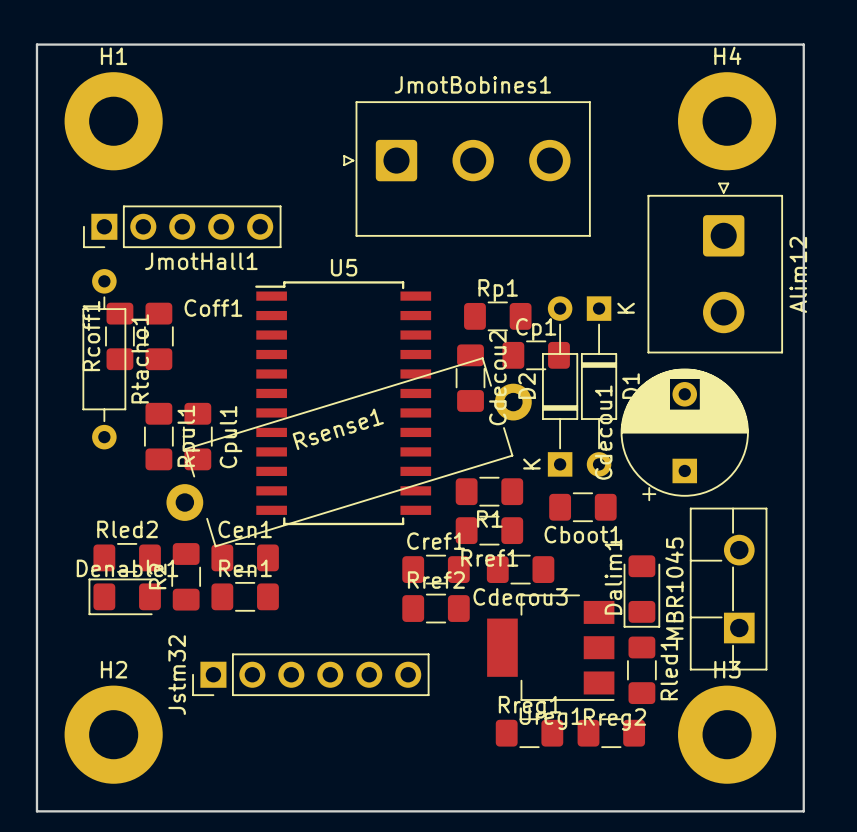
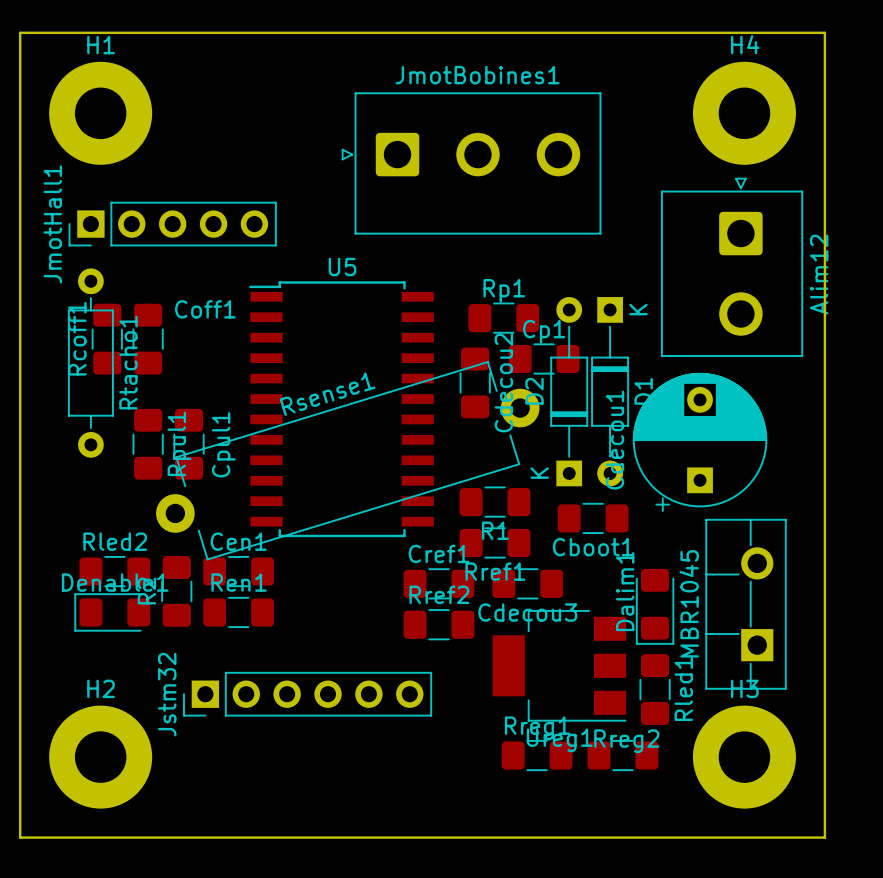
JmotHall1 name rotation: 0° (201, 261) -> 90° counterclockwise (52, 224)
Rsense1 name position: Rsense1 (338, 429) -> Rsense1 (327, 394)

